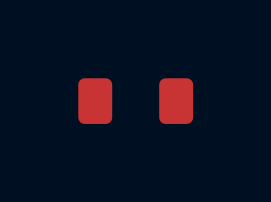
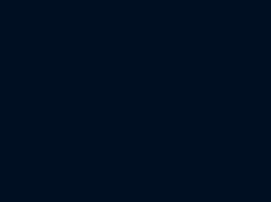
part: (135, 101) -> none

